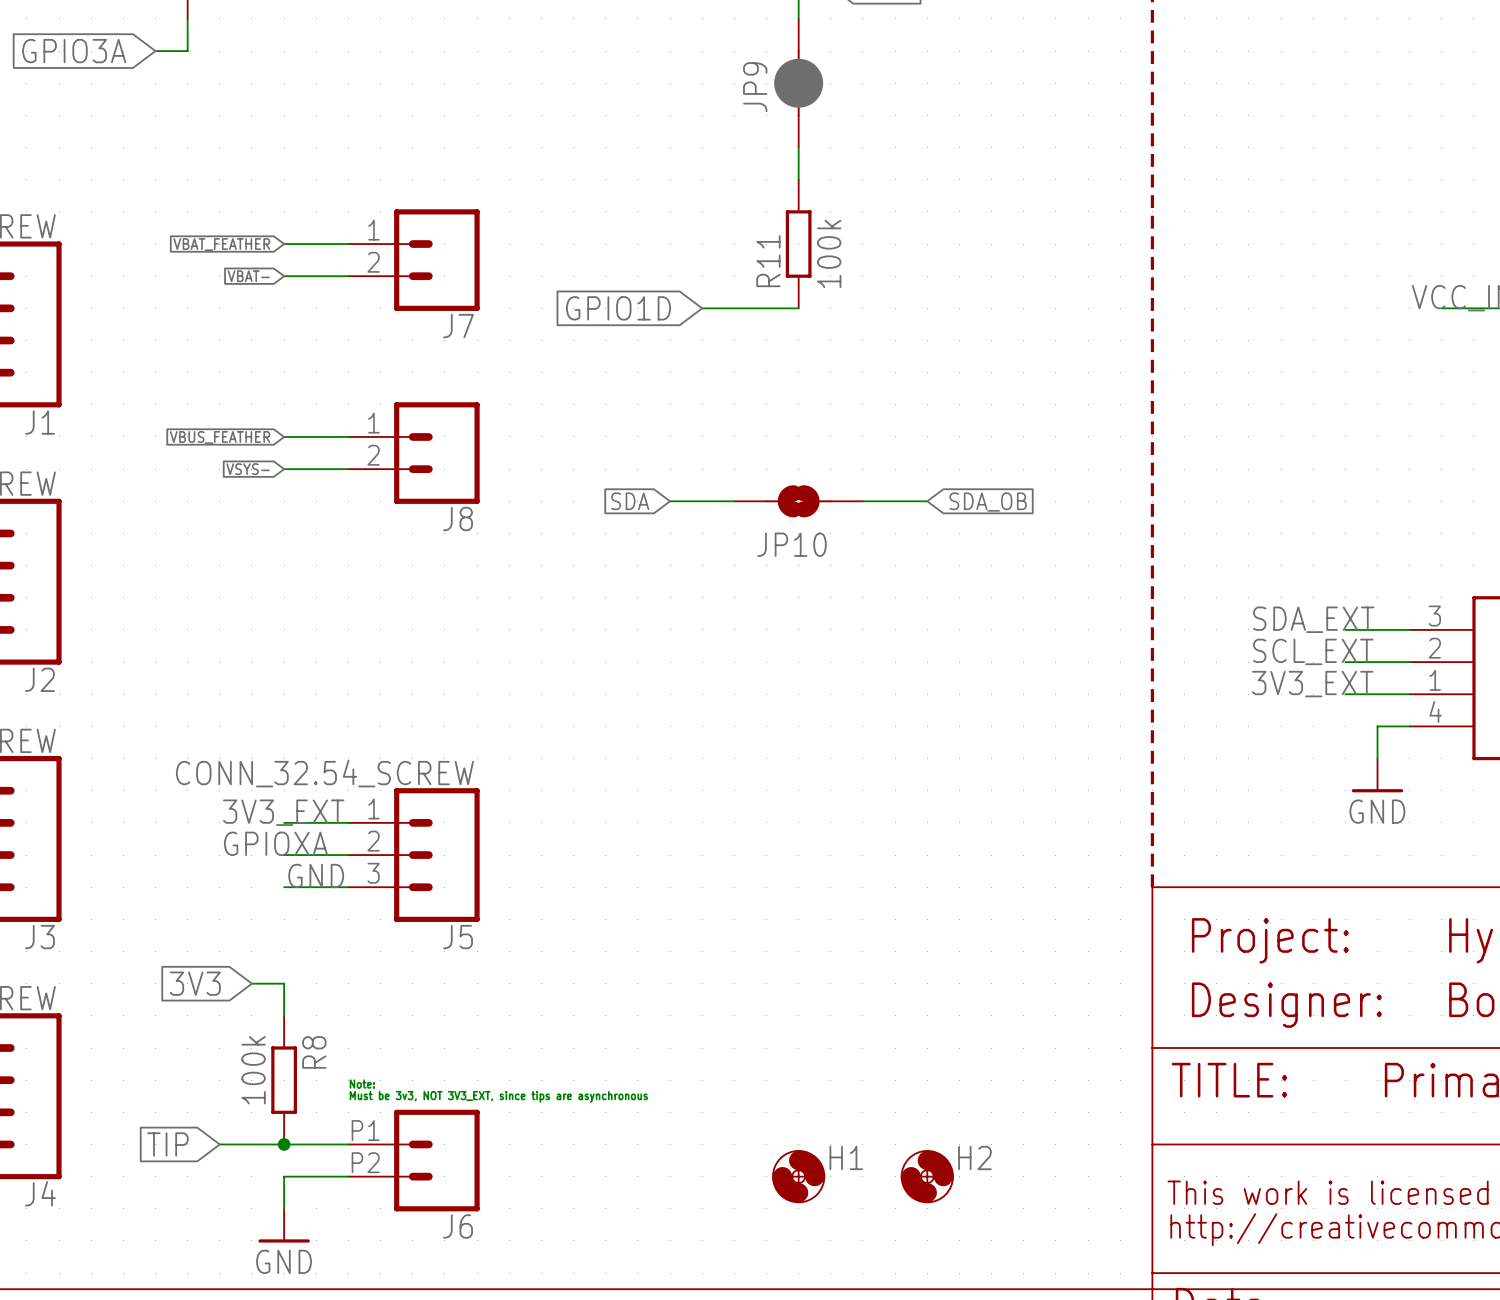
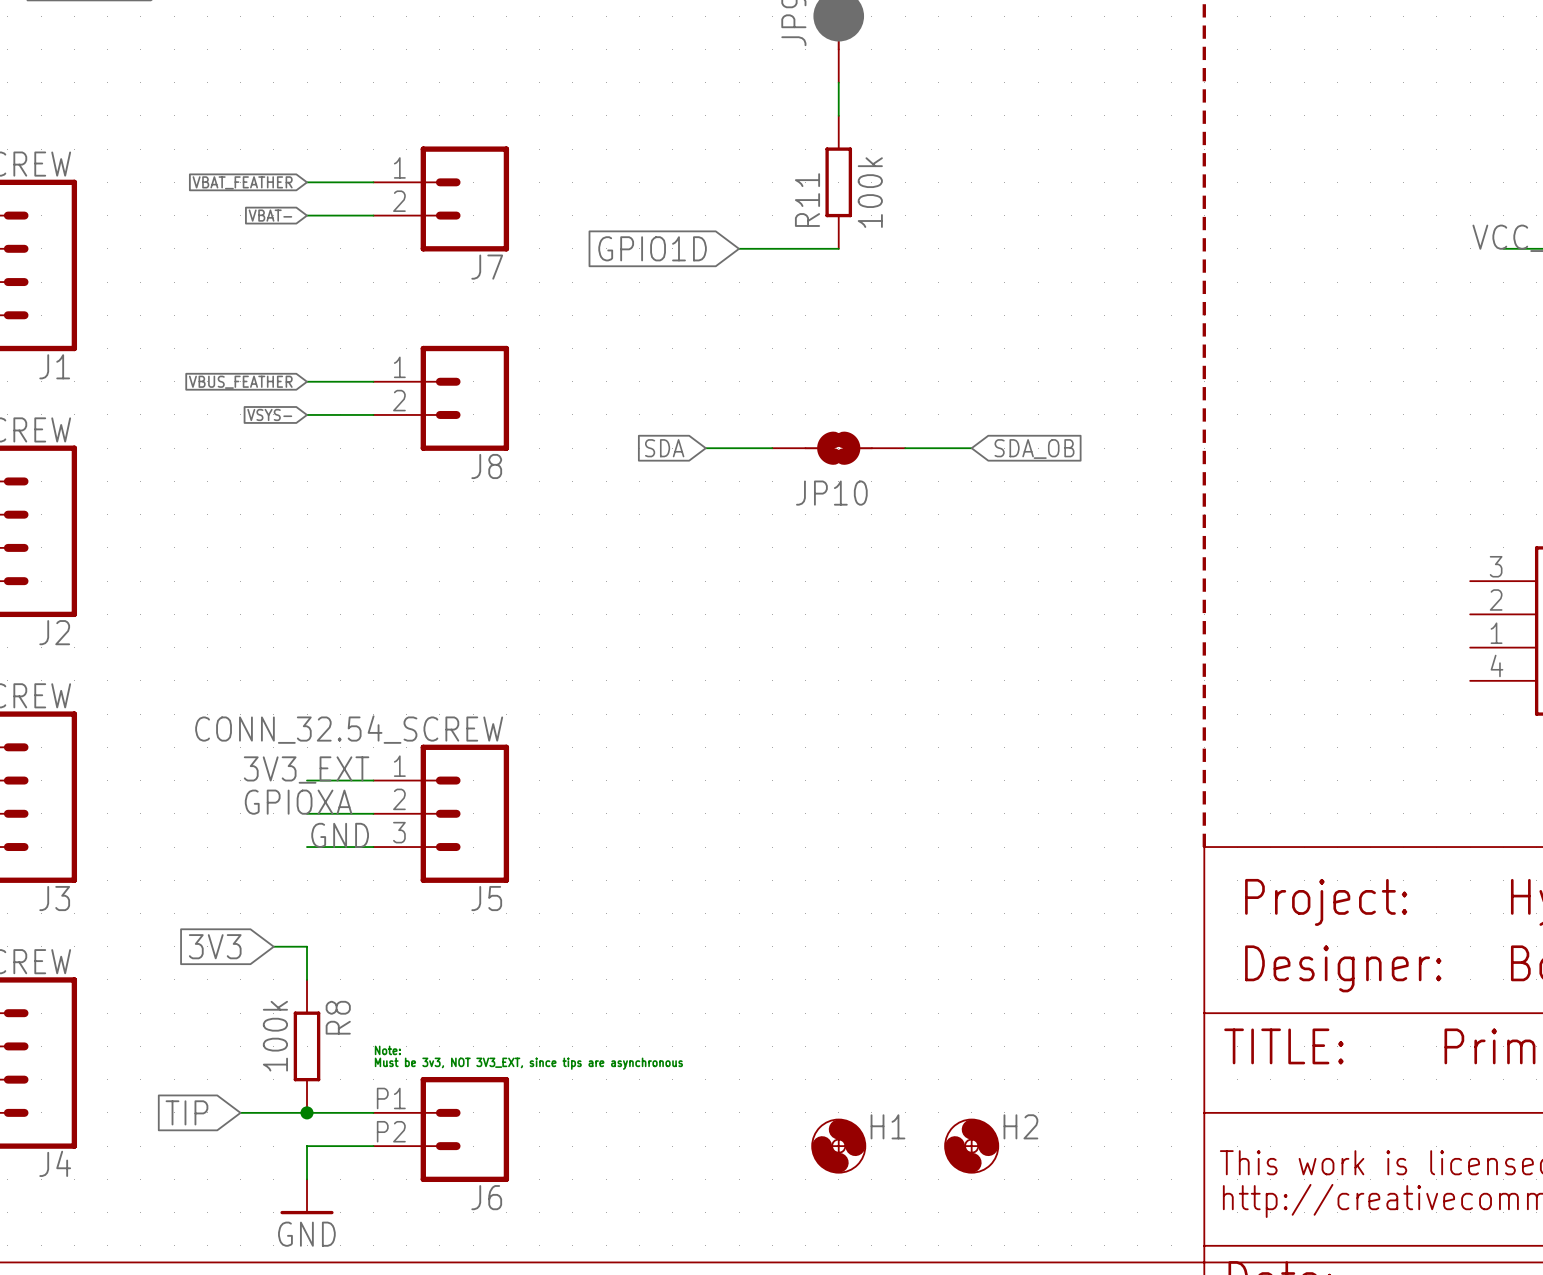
label: SDA_EXT (1313, 619) -> none
wire: (1345, 629) (1409, 629) -> none
label: SCL_EXT (1313, 651) -> none
wire: (1345, 662) (1409, 662) -> none
label: 3V3_EXT (1312, 684) -> none
wire: (1345, 694) (1409, 694) -> none
wire: (1409, 726) (1377, 726) (1377, 758) -> none
power symbol: GND (1377, 775) -> none

